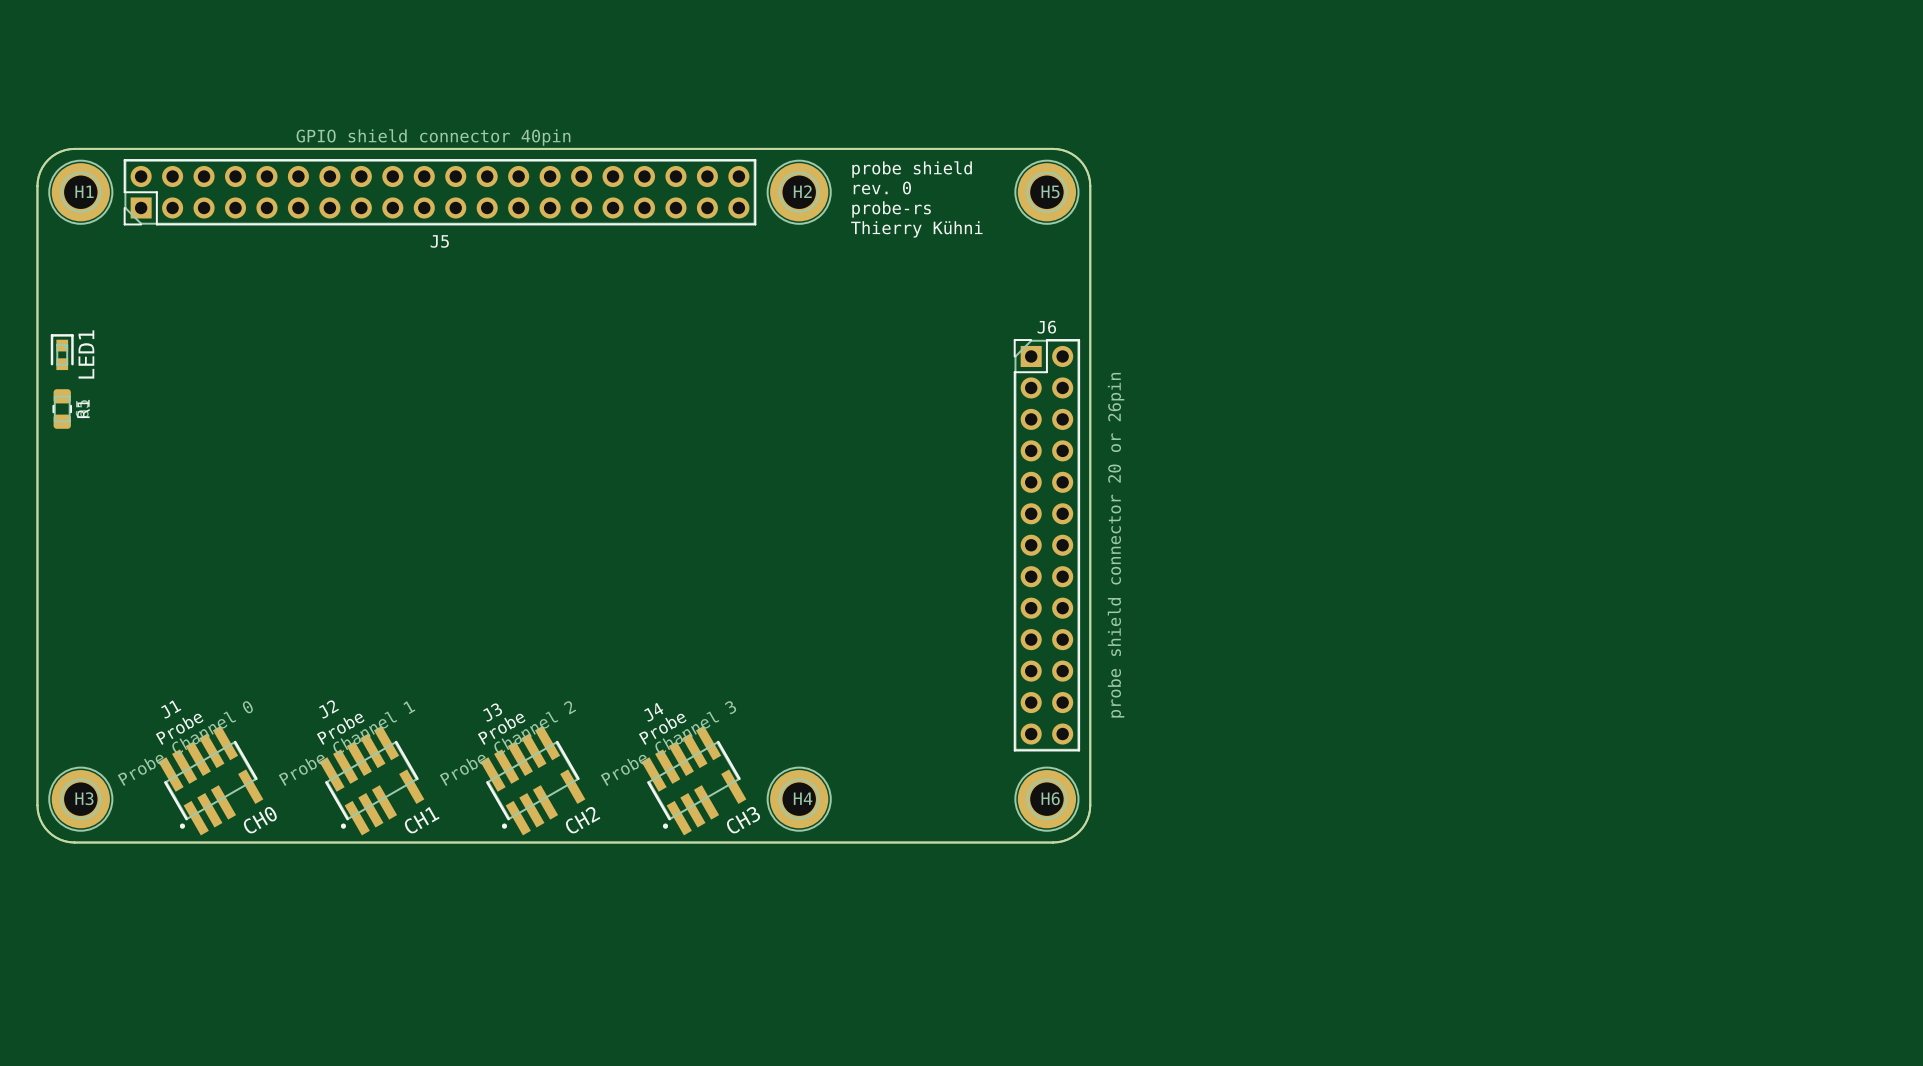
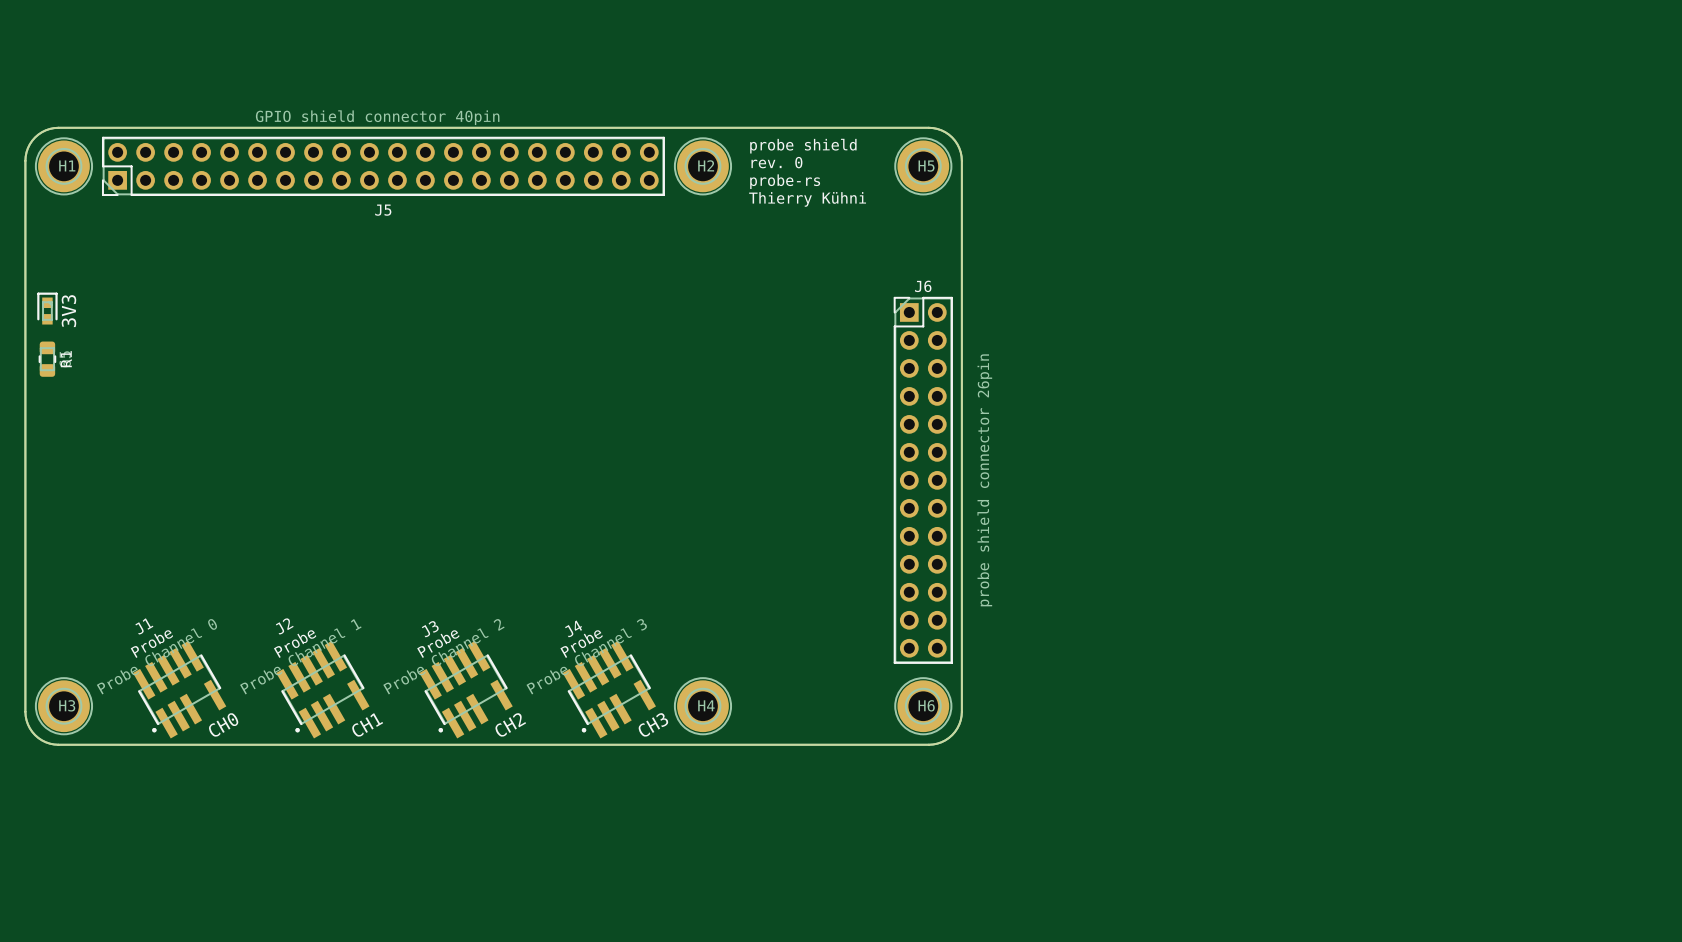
LED1 name: LED1 (86, 354) -> 3V3 (68, 311)
J6 value: probe shield connector 20 or 26pin (1116, 545) -> probe shield connector 26pin (984, 480)

